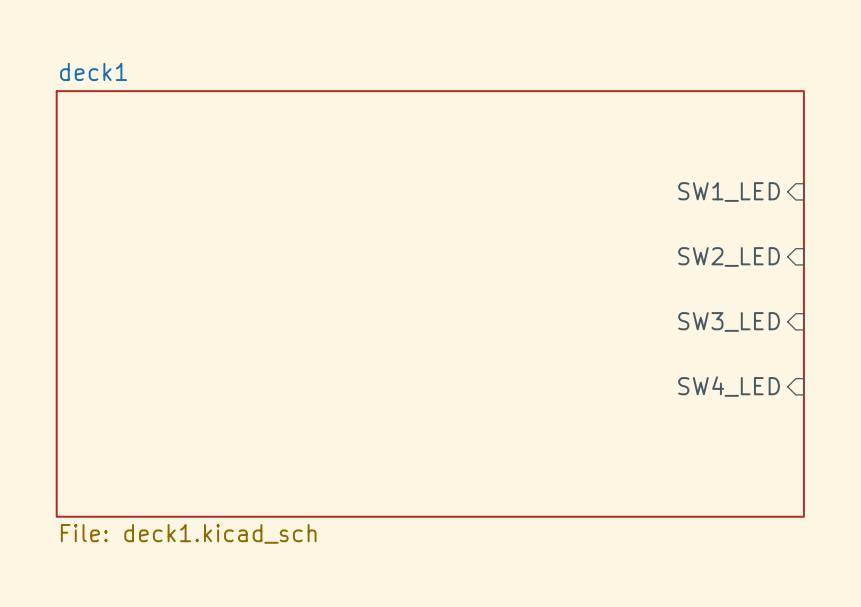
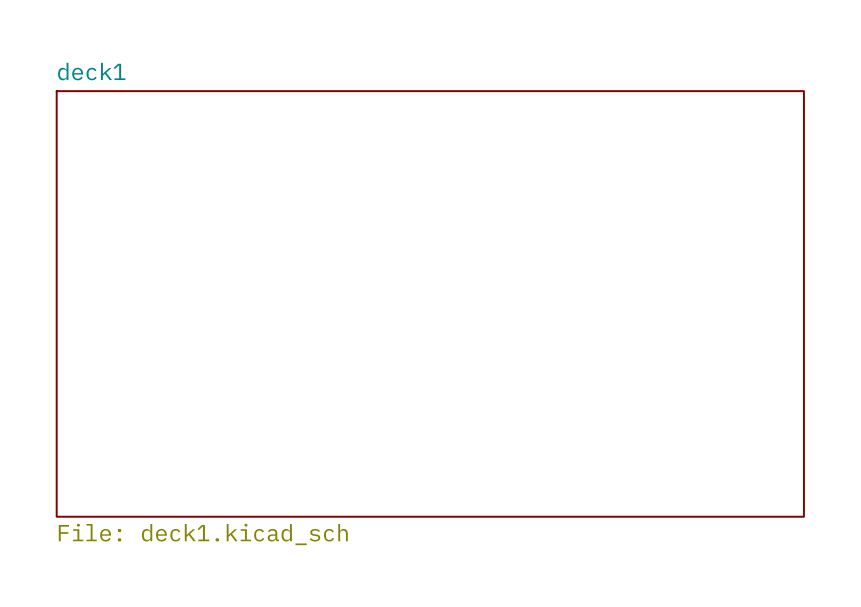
sheet pin: SW1_LED (729, 192) -> none
sheet pin: SW2_LED (729, 256) -> none
sheet pin: SW3_LED (729, 321) -> none
sheet pin: SW4_LED (729, 386) -> none

